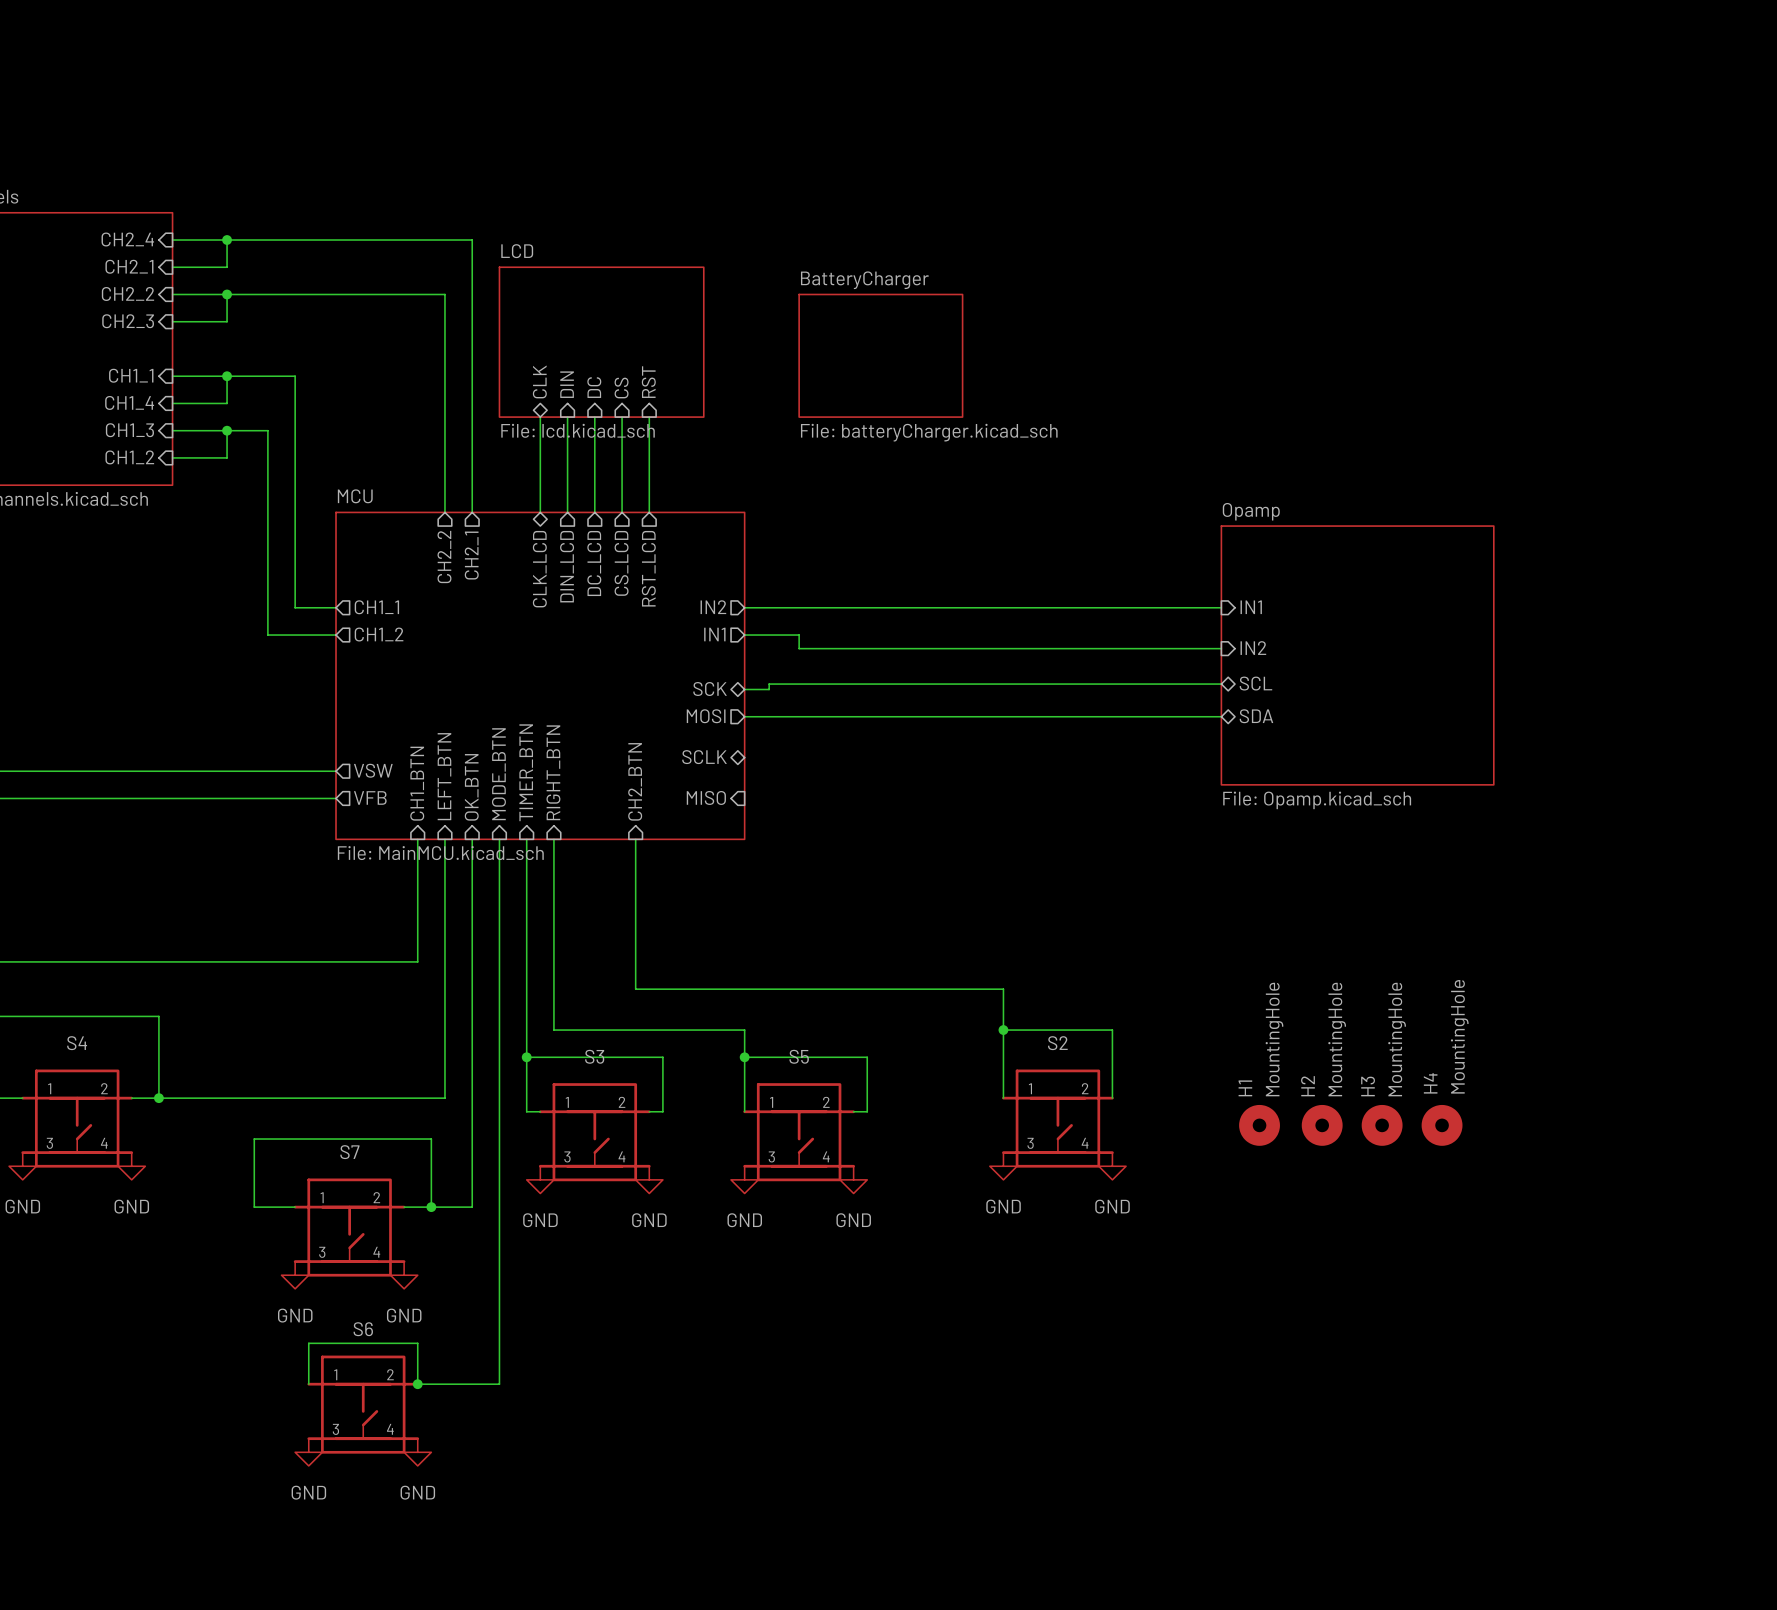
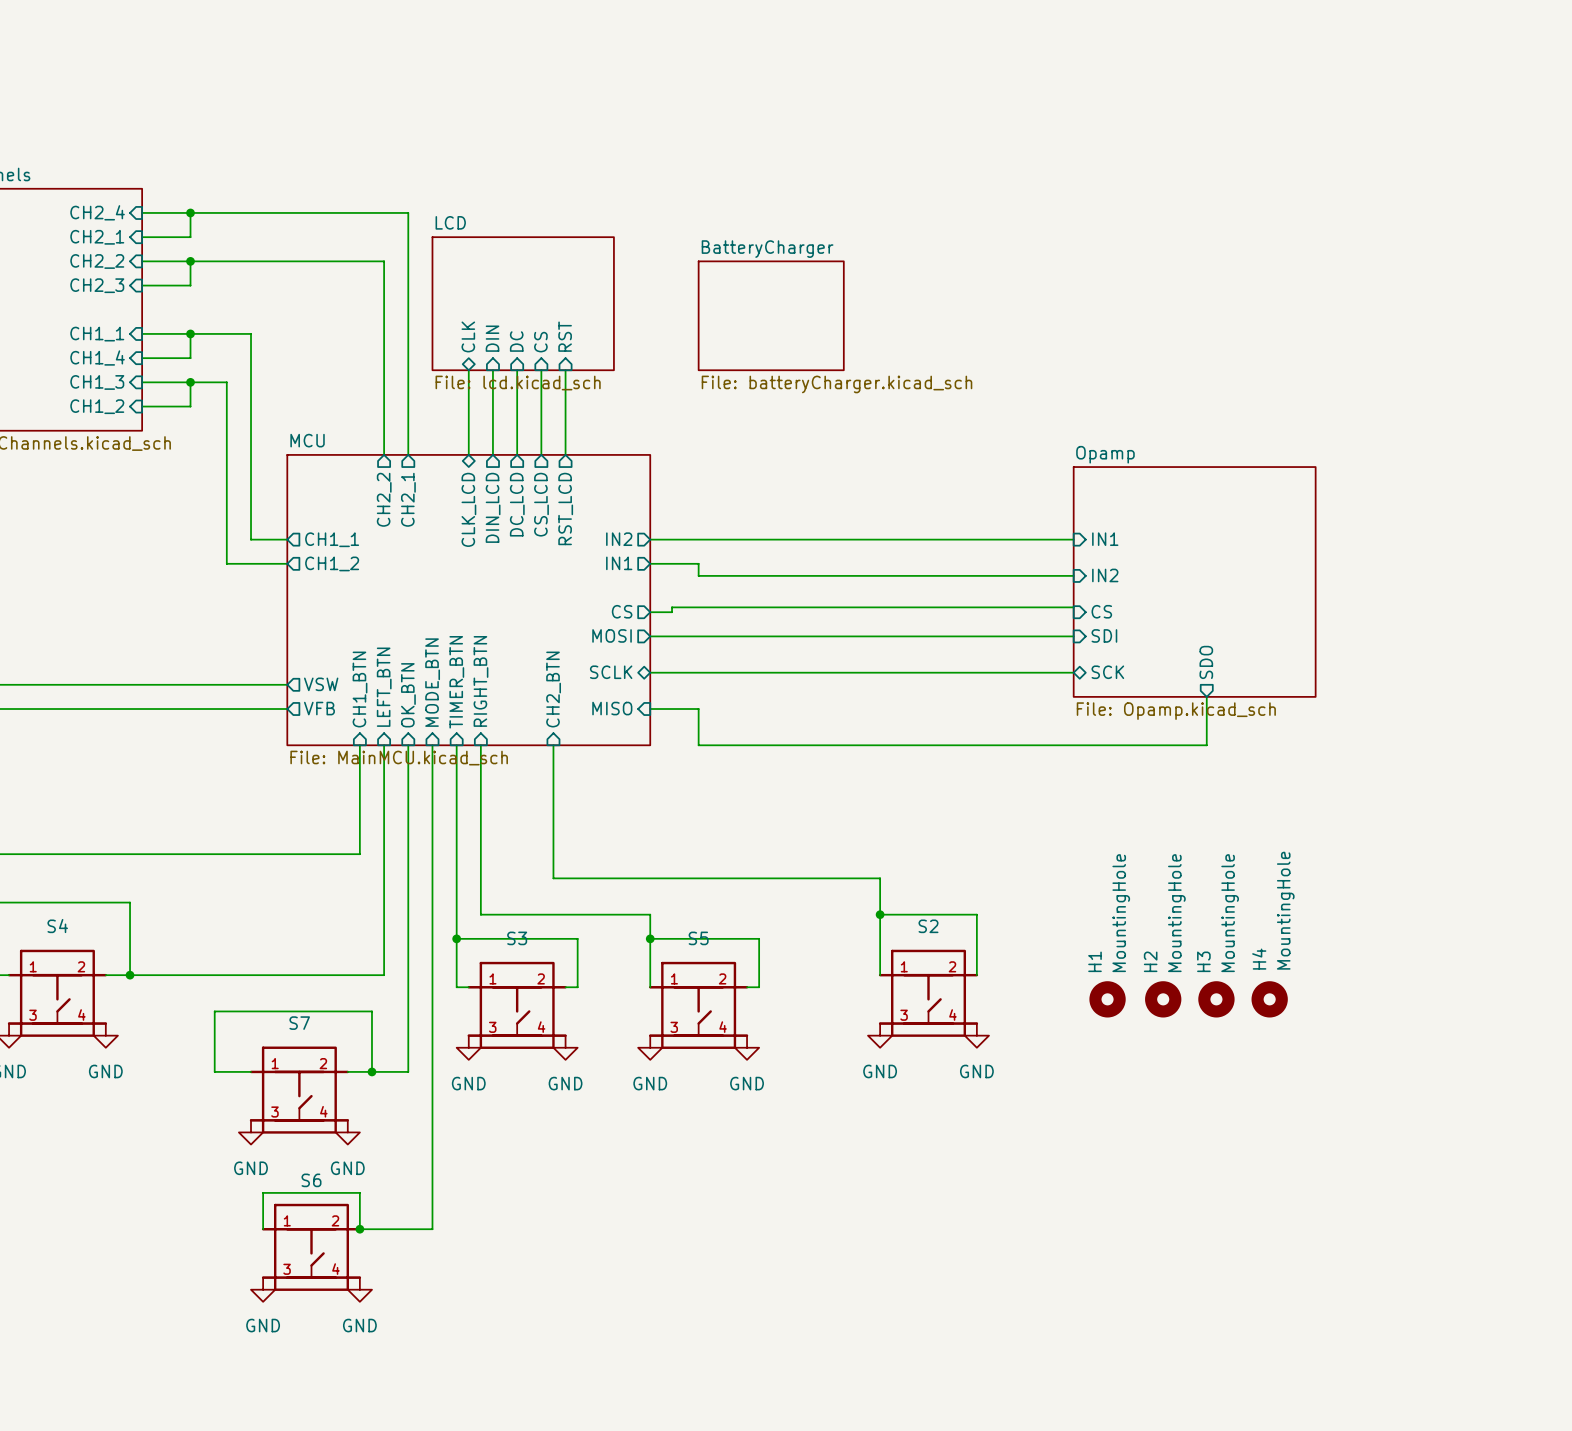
sheet pin shape: bidirectional (1255, 683) -> input (1101, 611)
sheet pin: SCL (1255, 683) -> CS (1101, 611)
sheet pin shape: bidirectional (710, 689) -> output (622, 611)
sheet pin: SCK (710, 689) -> CS (622, 611)
sheet pin shape: bidirectional (1256, 716) -> input (1104, 635)
sheet pin: SDA (1256, 716) -> SDI (1104, 635)
sheet pin: none -> SDO (1206, 662)
wire: none -> (650, 672) (1073, 672)
sheet pin: none -> SCK (1107, 672)
wire: none -> (1206, 696) (1206, 745) (698, 745) (698, 709) (650, 709)

